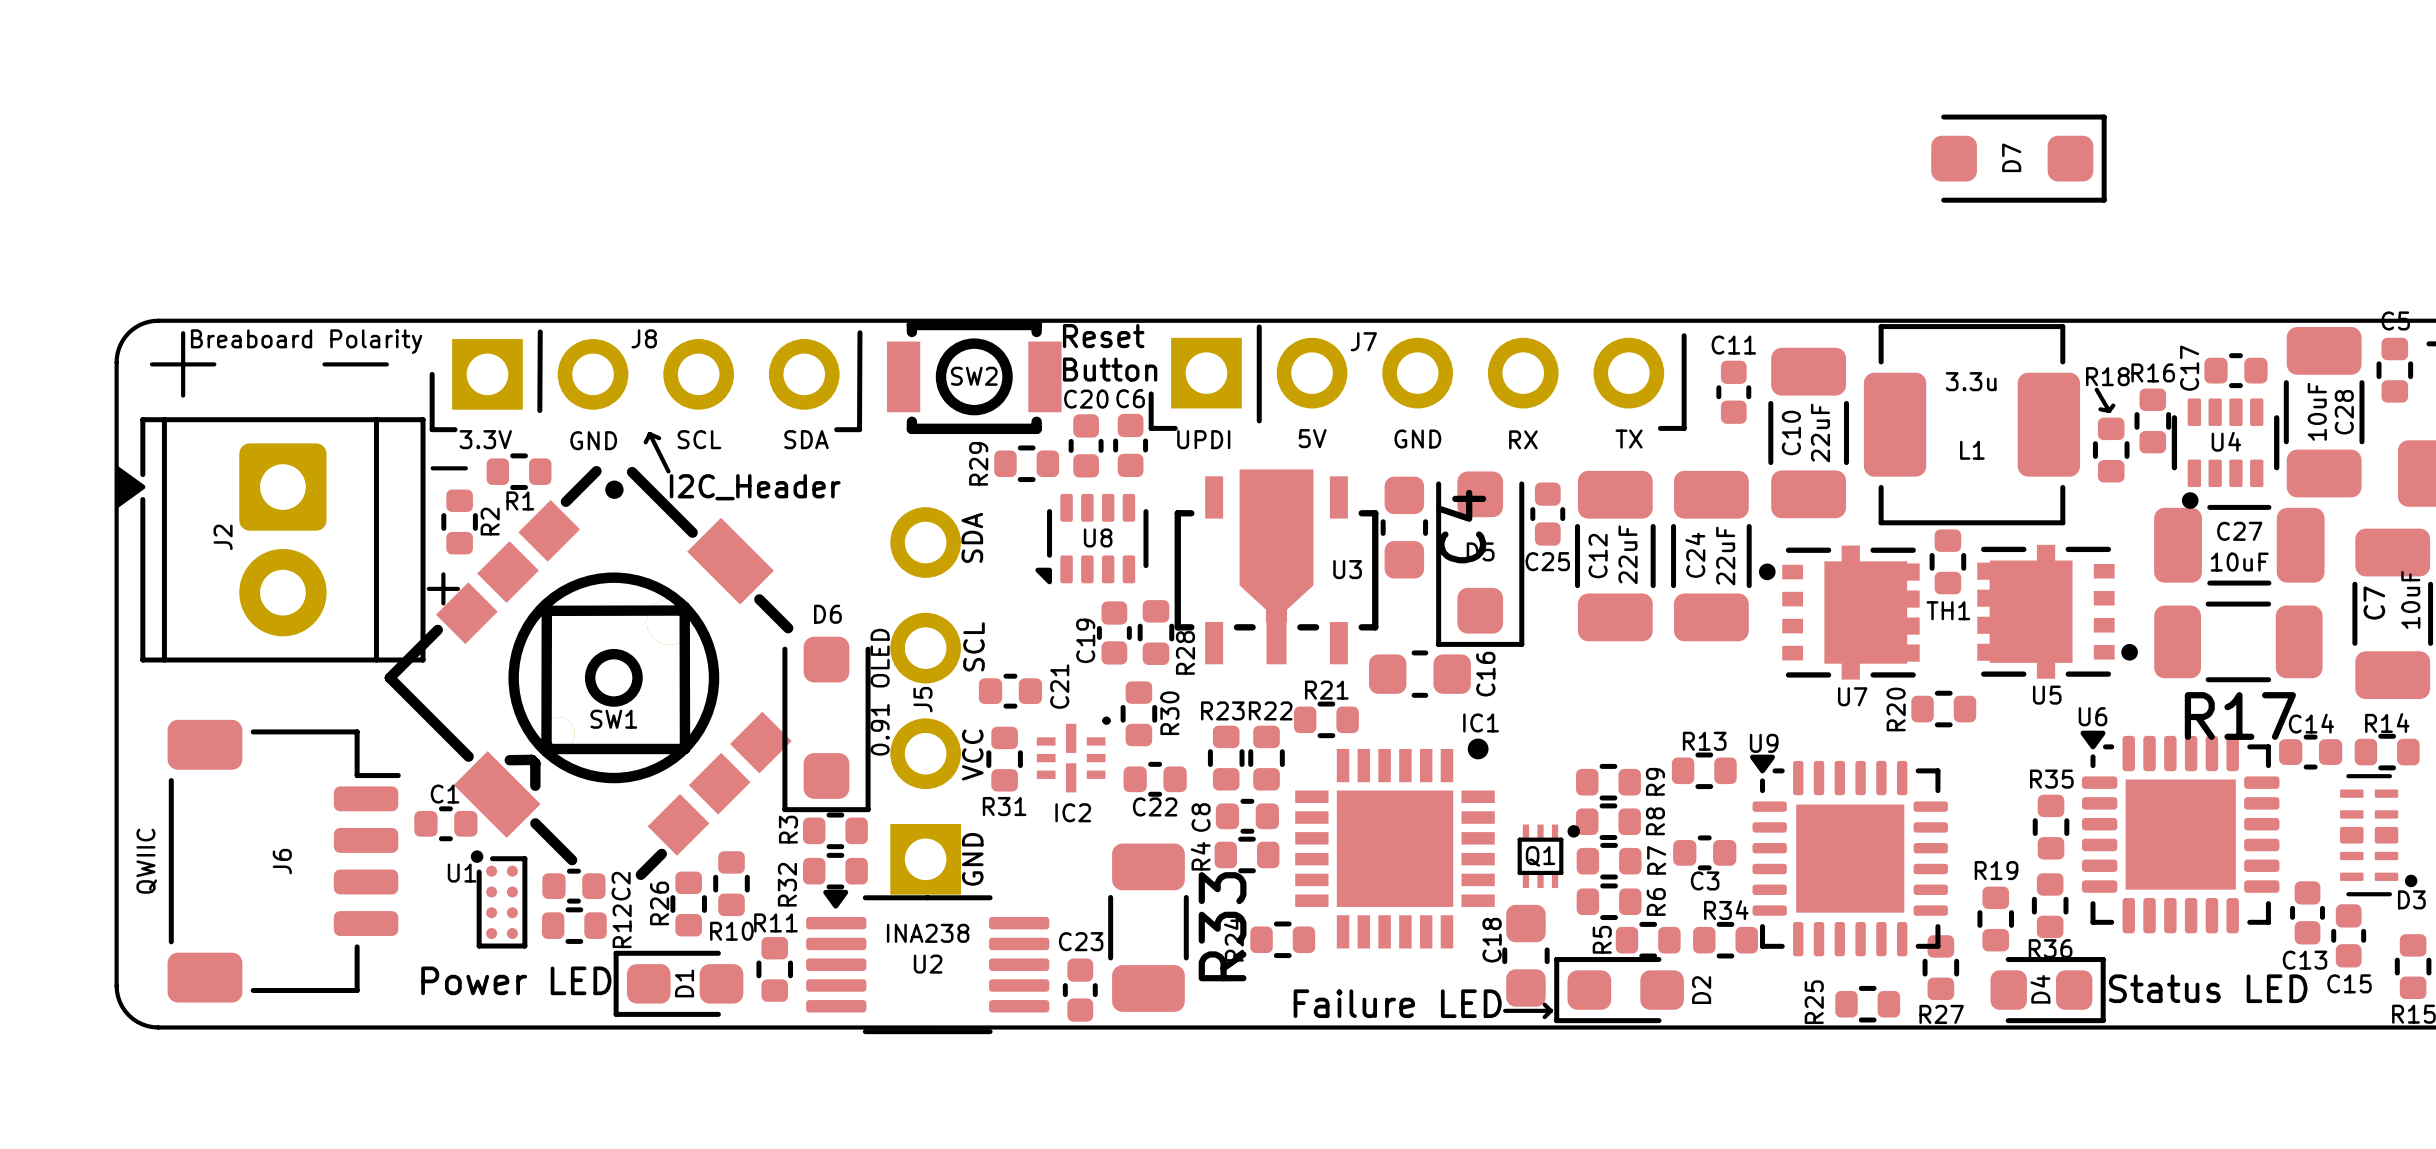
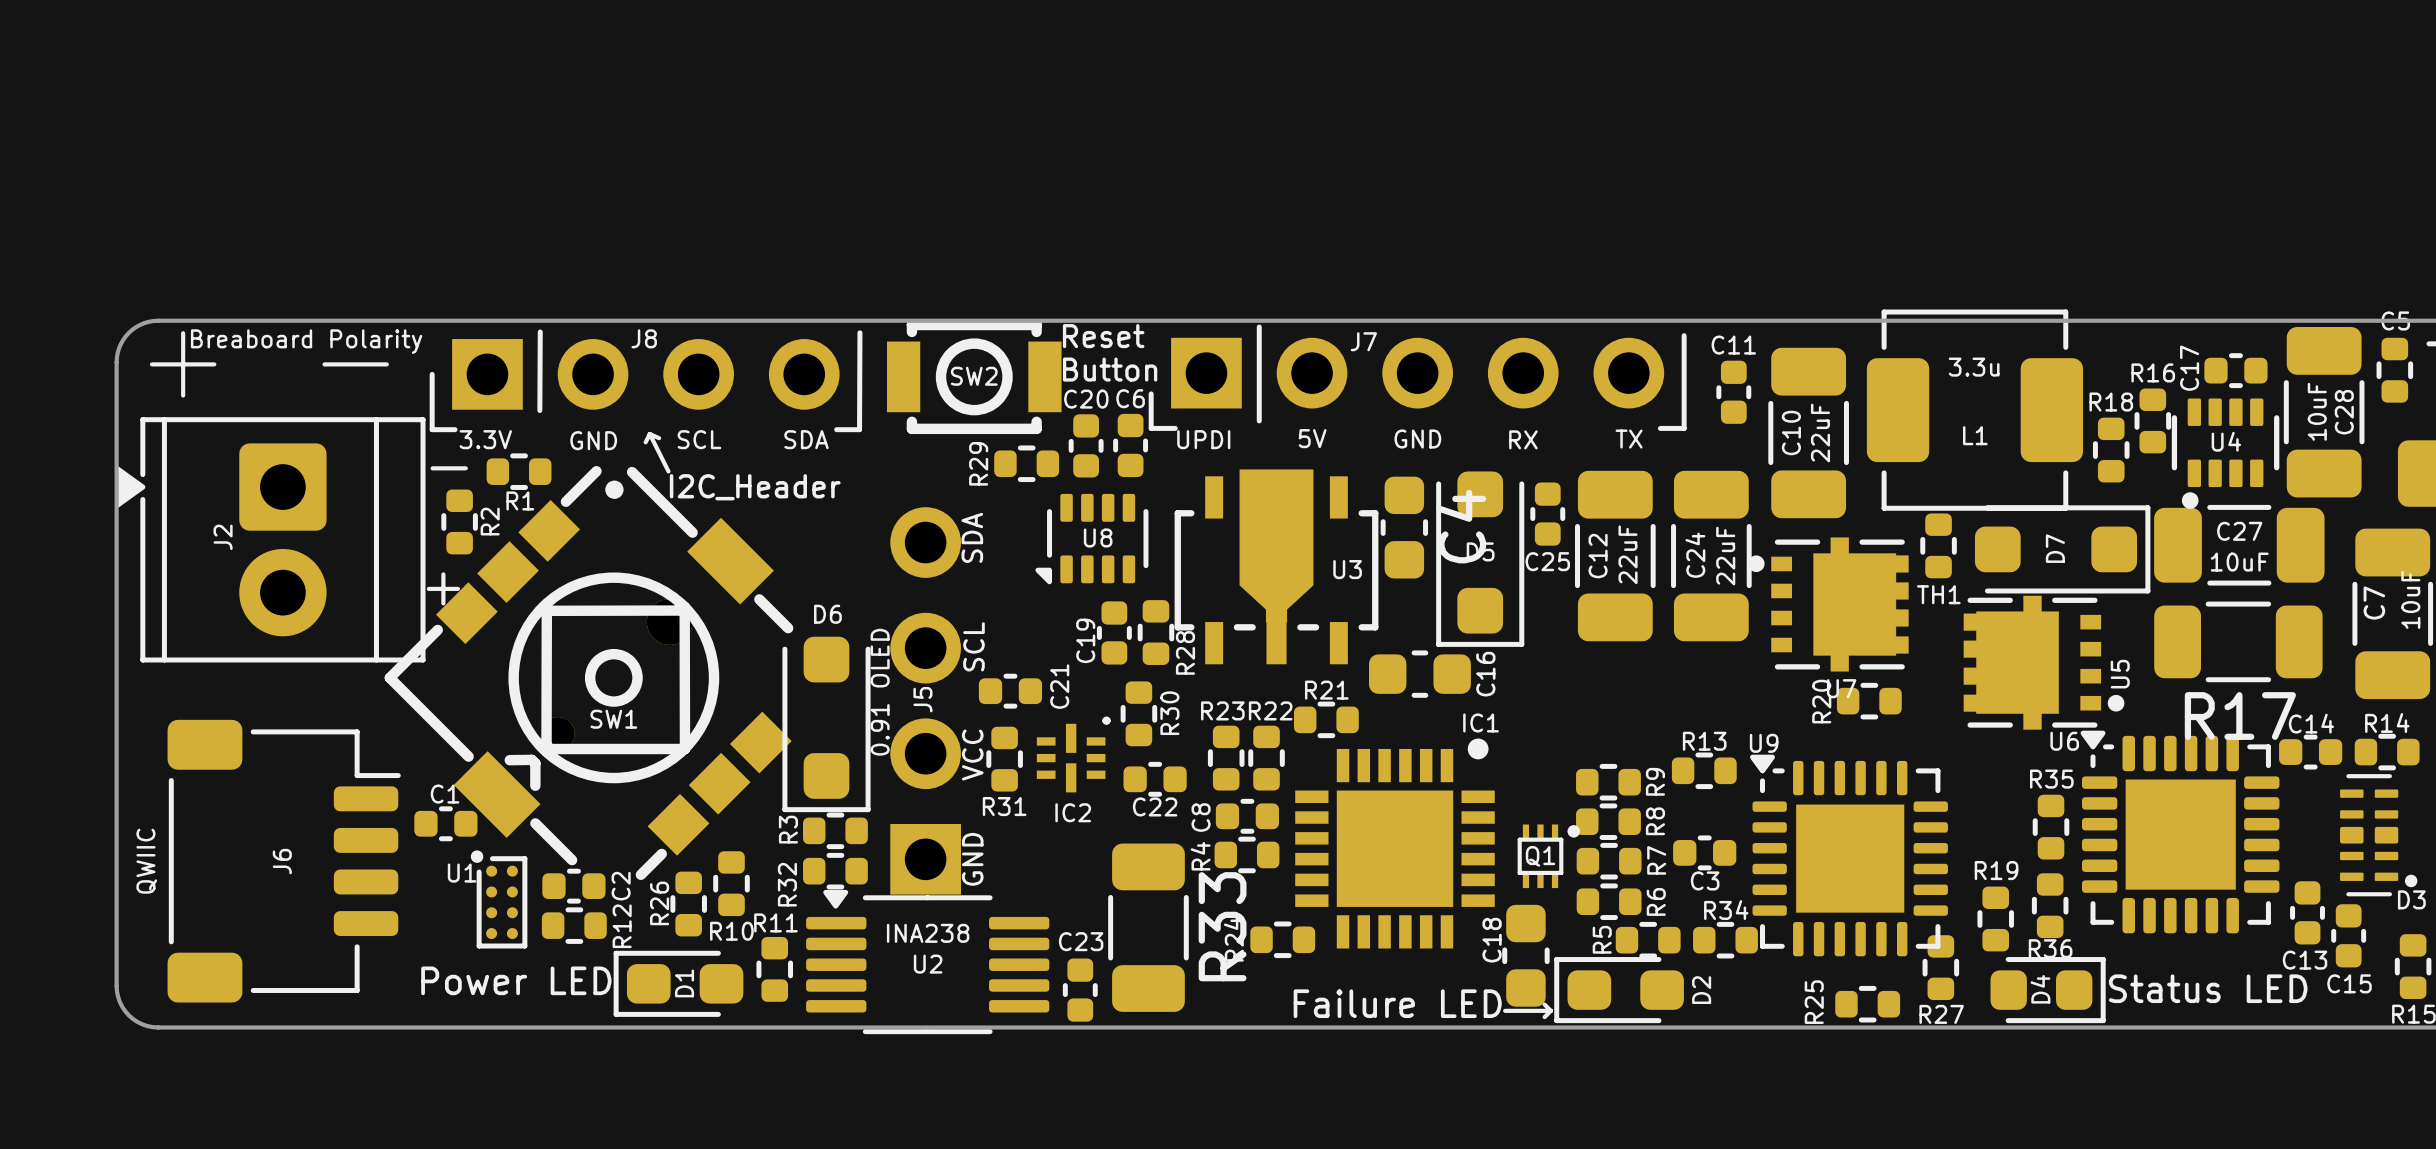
D7 position: (2018, 158) -> (2062, 549)
R18 name position: R18 (2107, 376) -> R18 (2111, 402)
line: (2096, 389) (2109, 410) -> none
line: (2113, 405) (2109, 410) -> none
line: (2100, 409) (2109, 410) -> none
L1 position: (1971, 424) -> (1974, 410)
TH1 position: (1947, 561) -> (1938, 545)
U5 position: (2057, 611) -> (2044, 662)
U7 position: (1839, 612) -> (1828, 604)
U5 name rotation: 0° (2047, 695) -> 90° counterclockwise (2120, 674)
U5 name position: U5 (2047, 695) -> U5 (2120, 674)
R20 position: (1943, 709) -> (1869, 701)
U6 name position: U6 (2092, 716) -> U6 (2064, 741)

